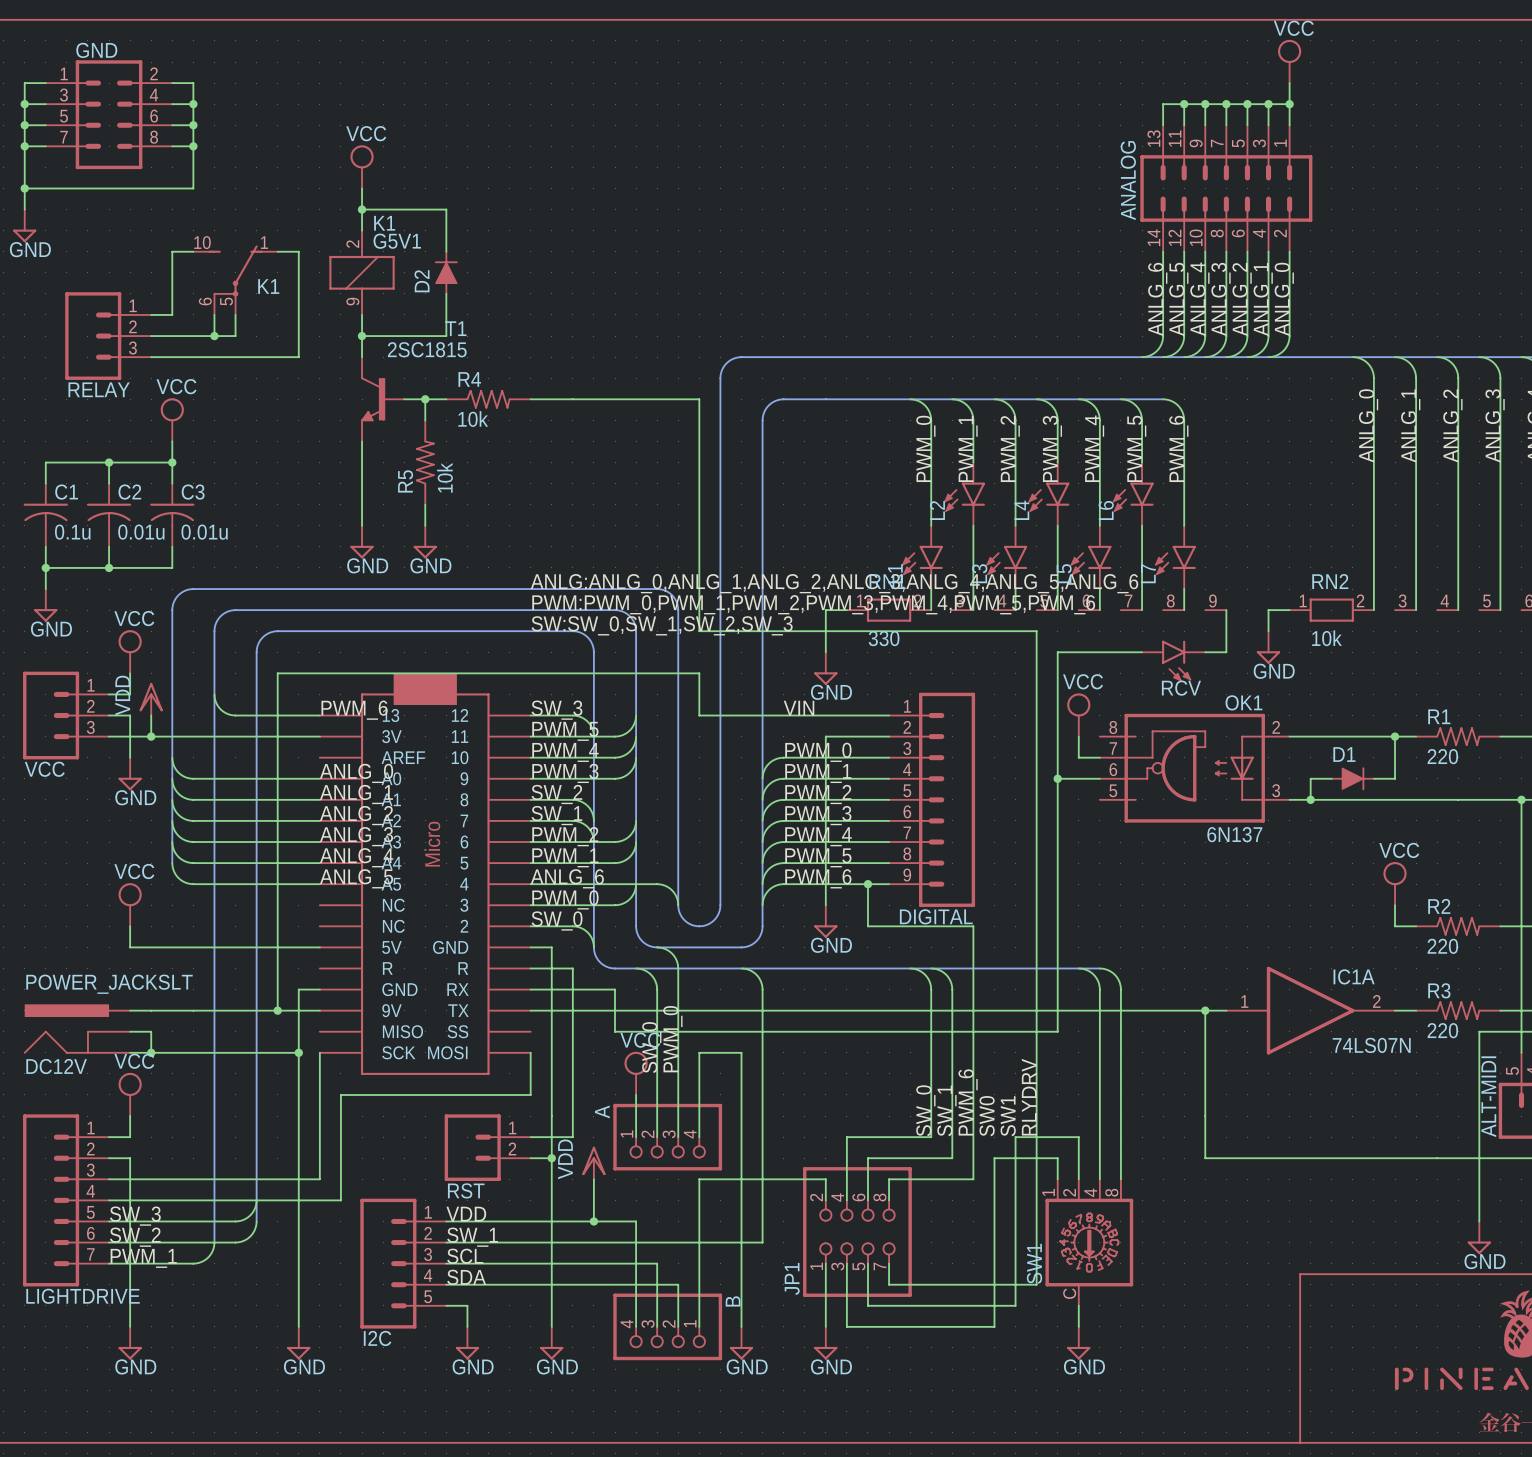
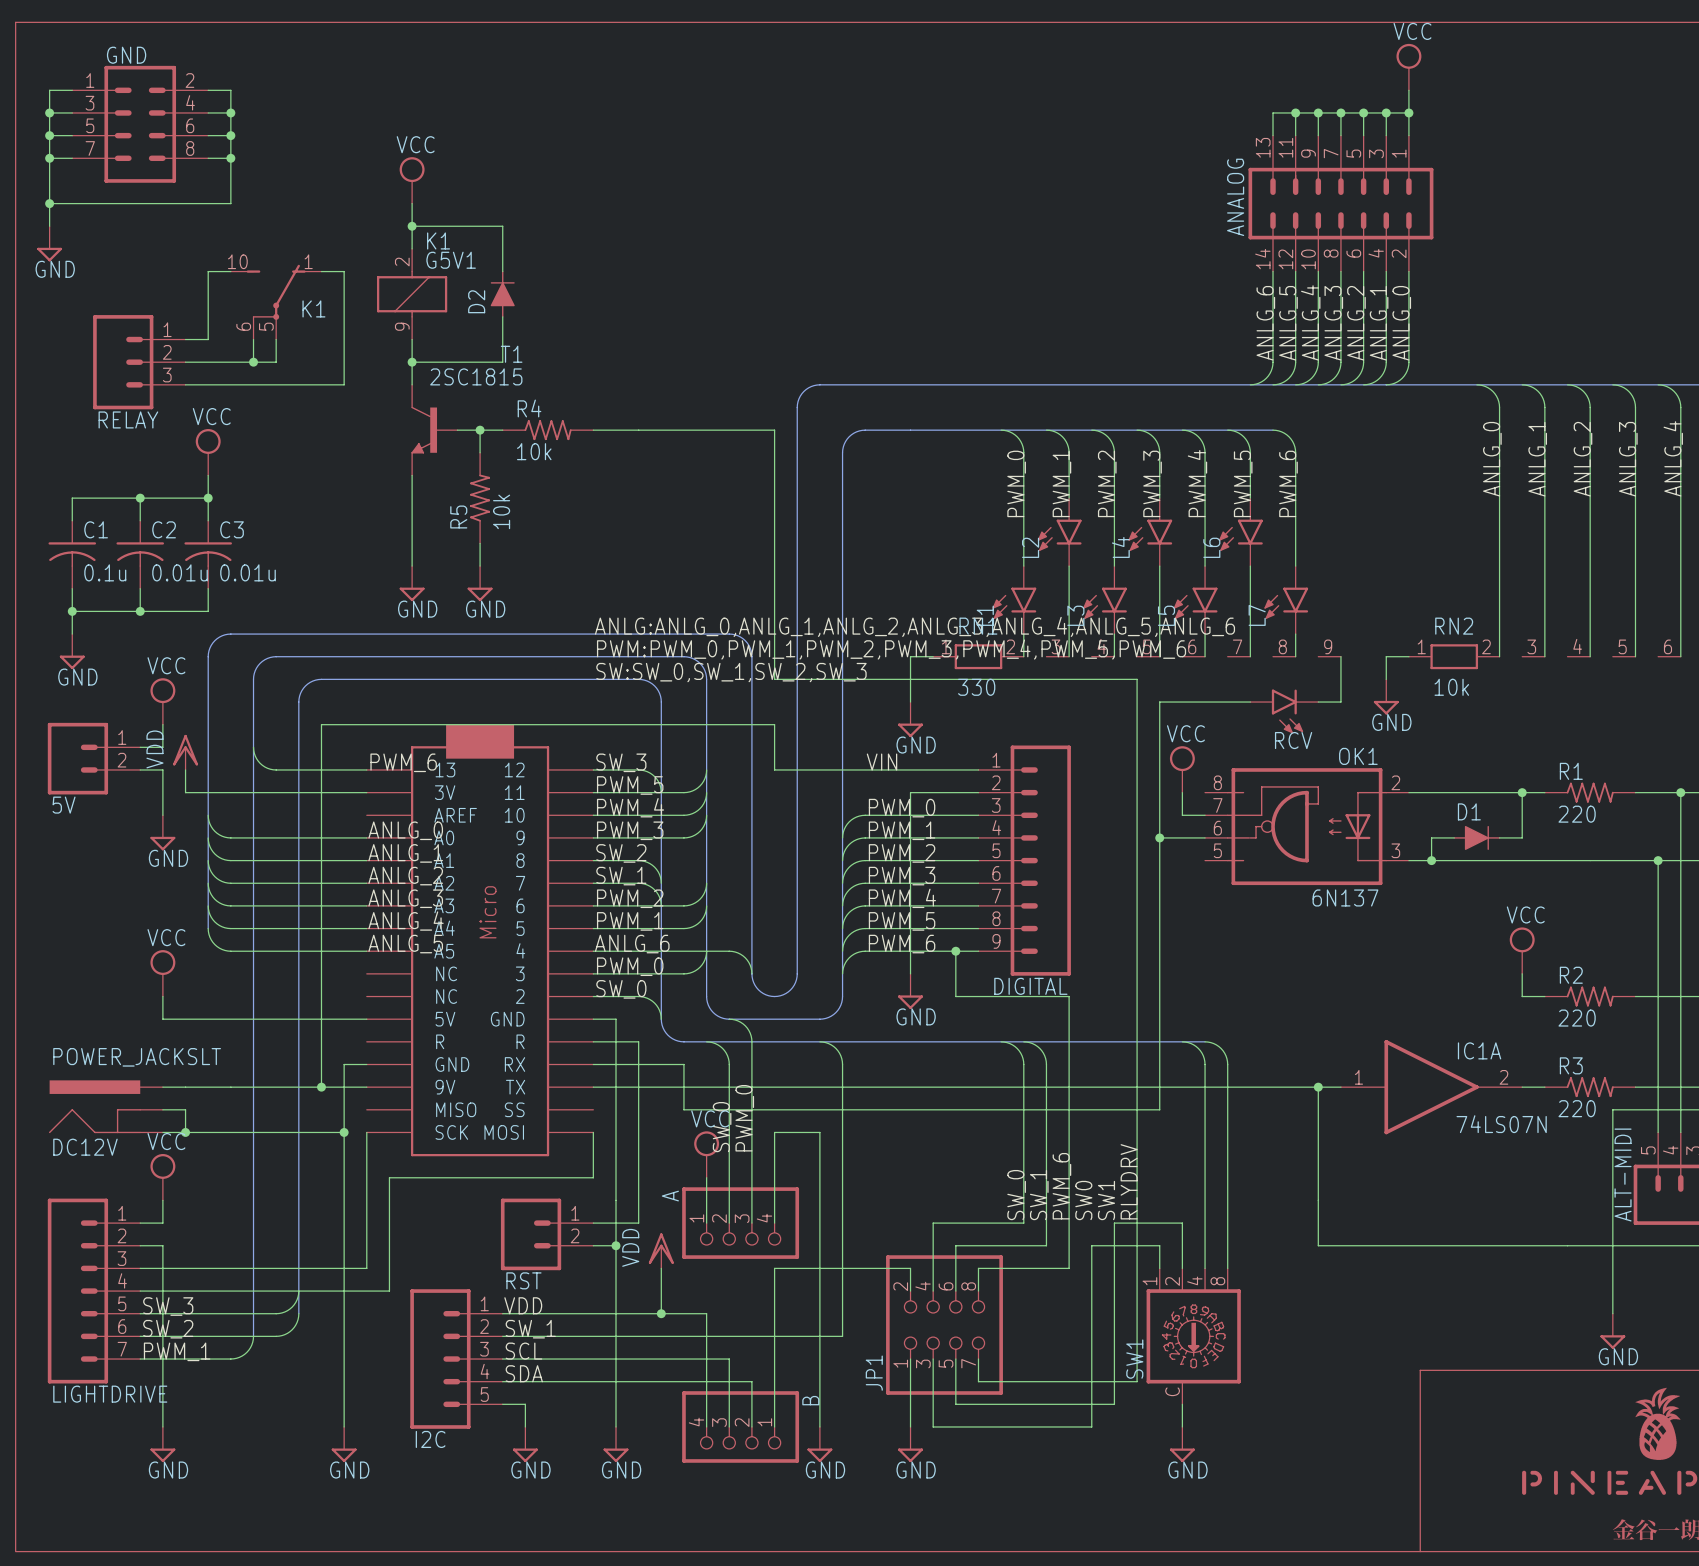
5V: none -> (94, 758)
VCC: (66, 715) -> none
wire: (109, 736) (151, 736) -> none
junction: (151, 736) -> none

